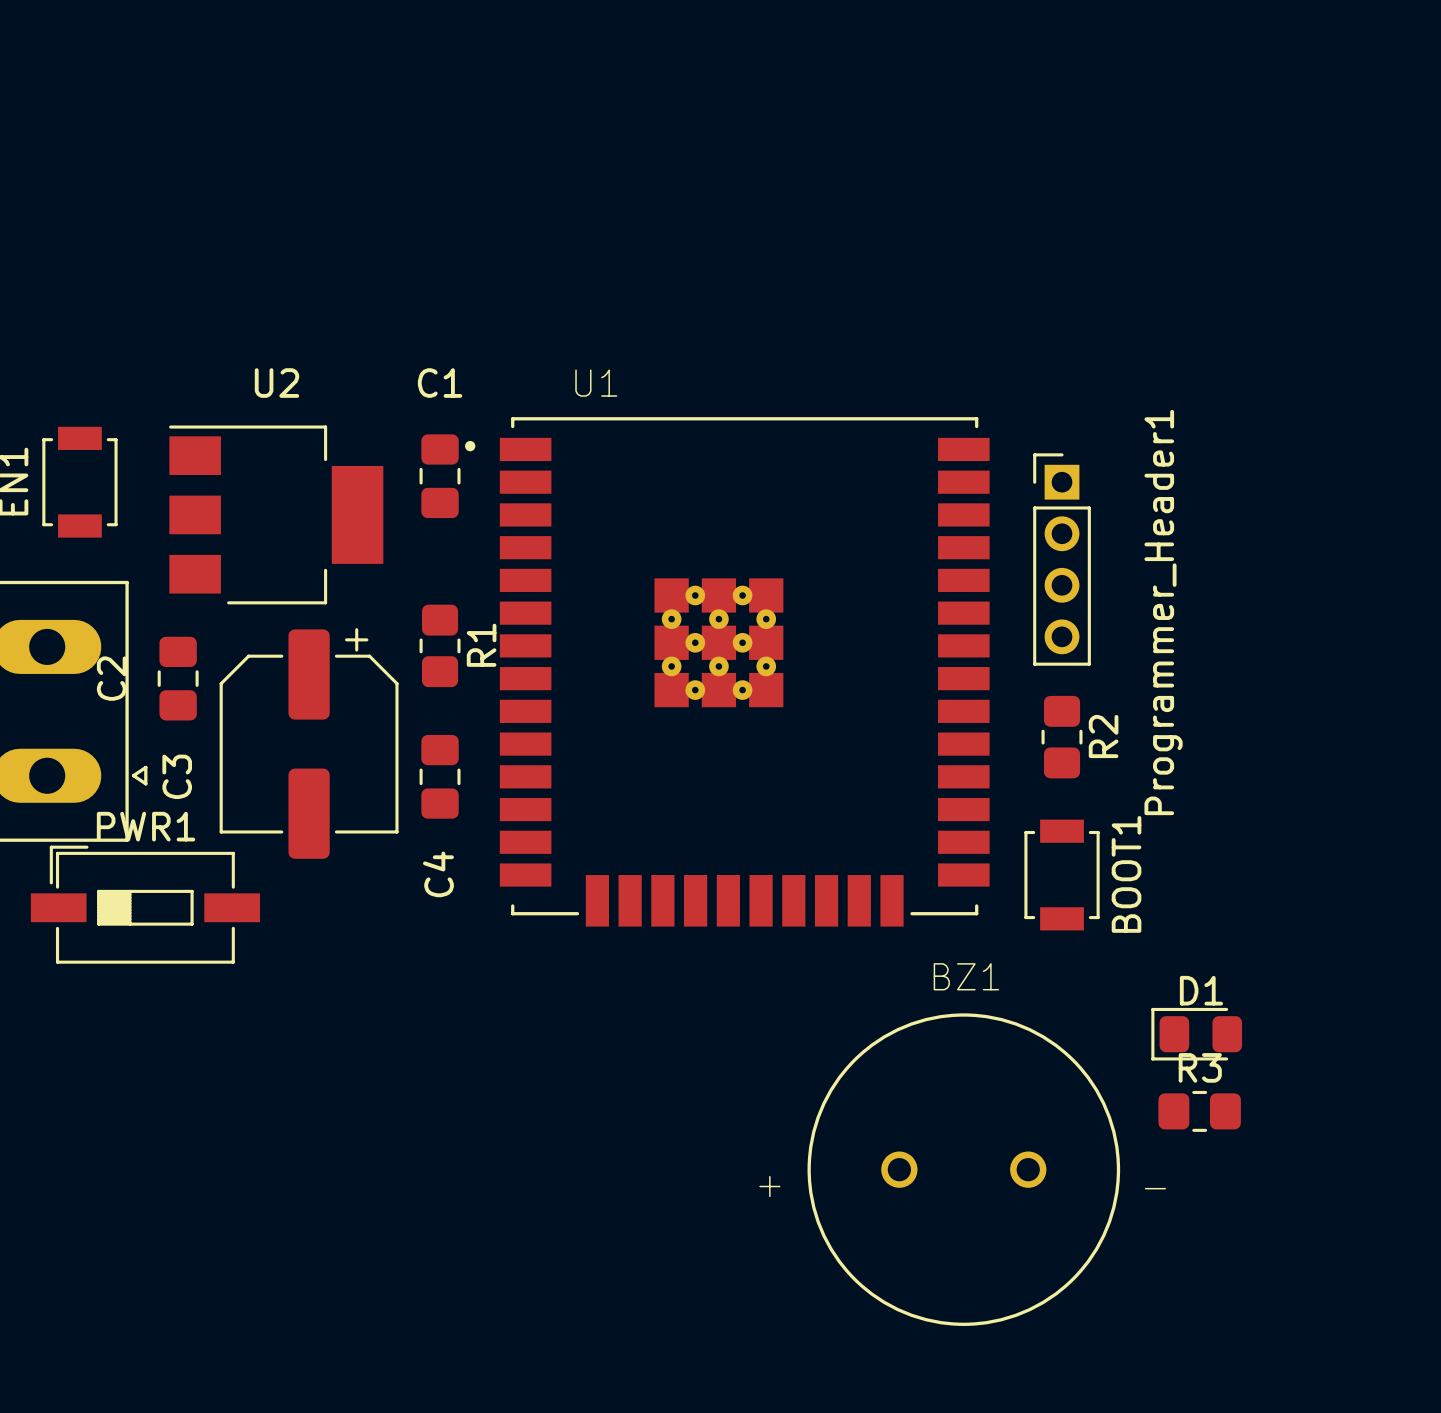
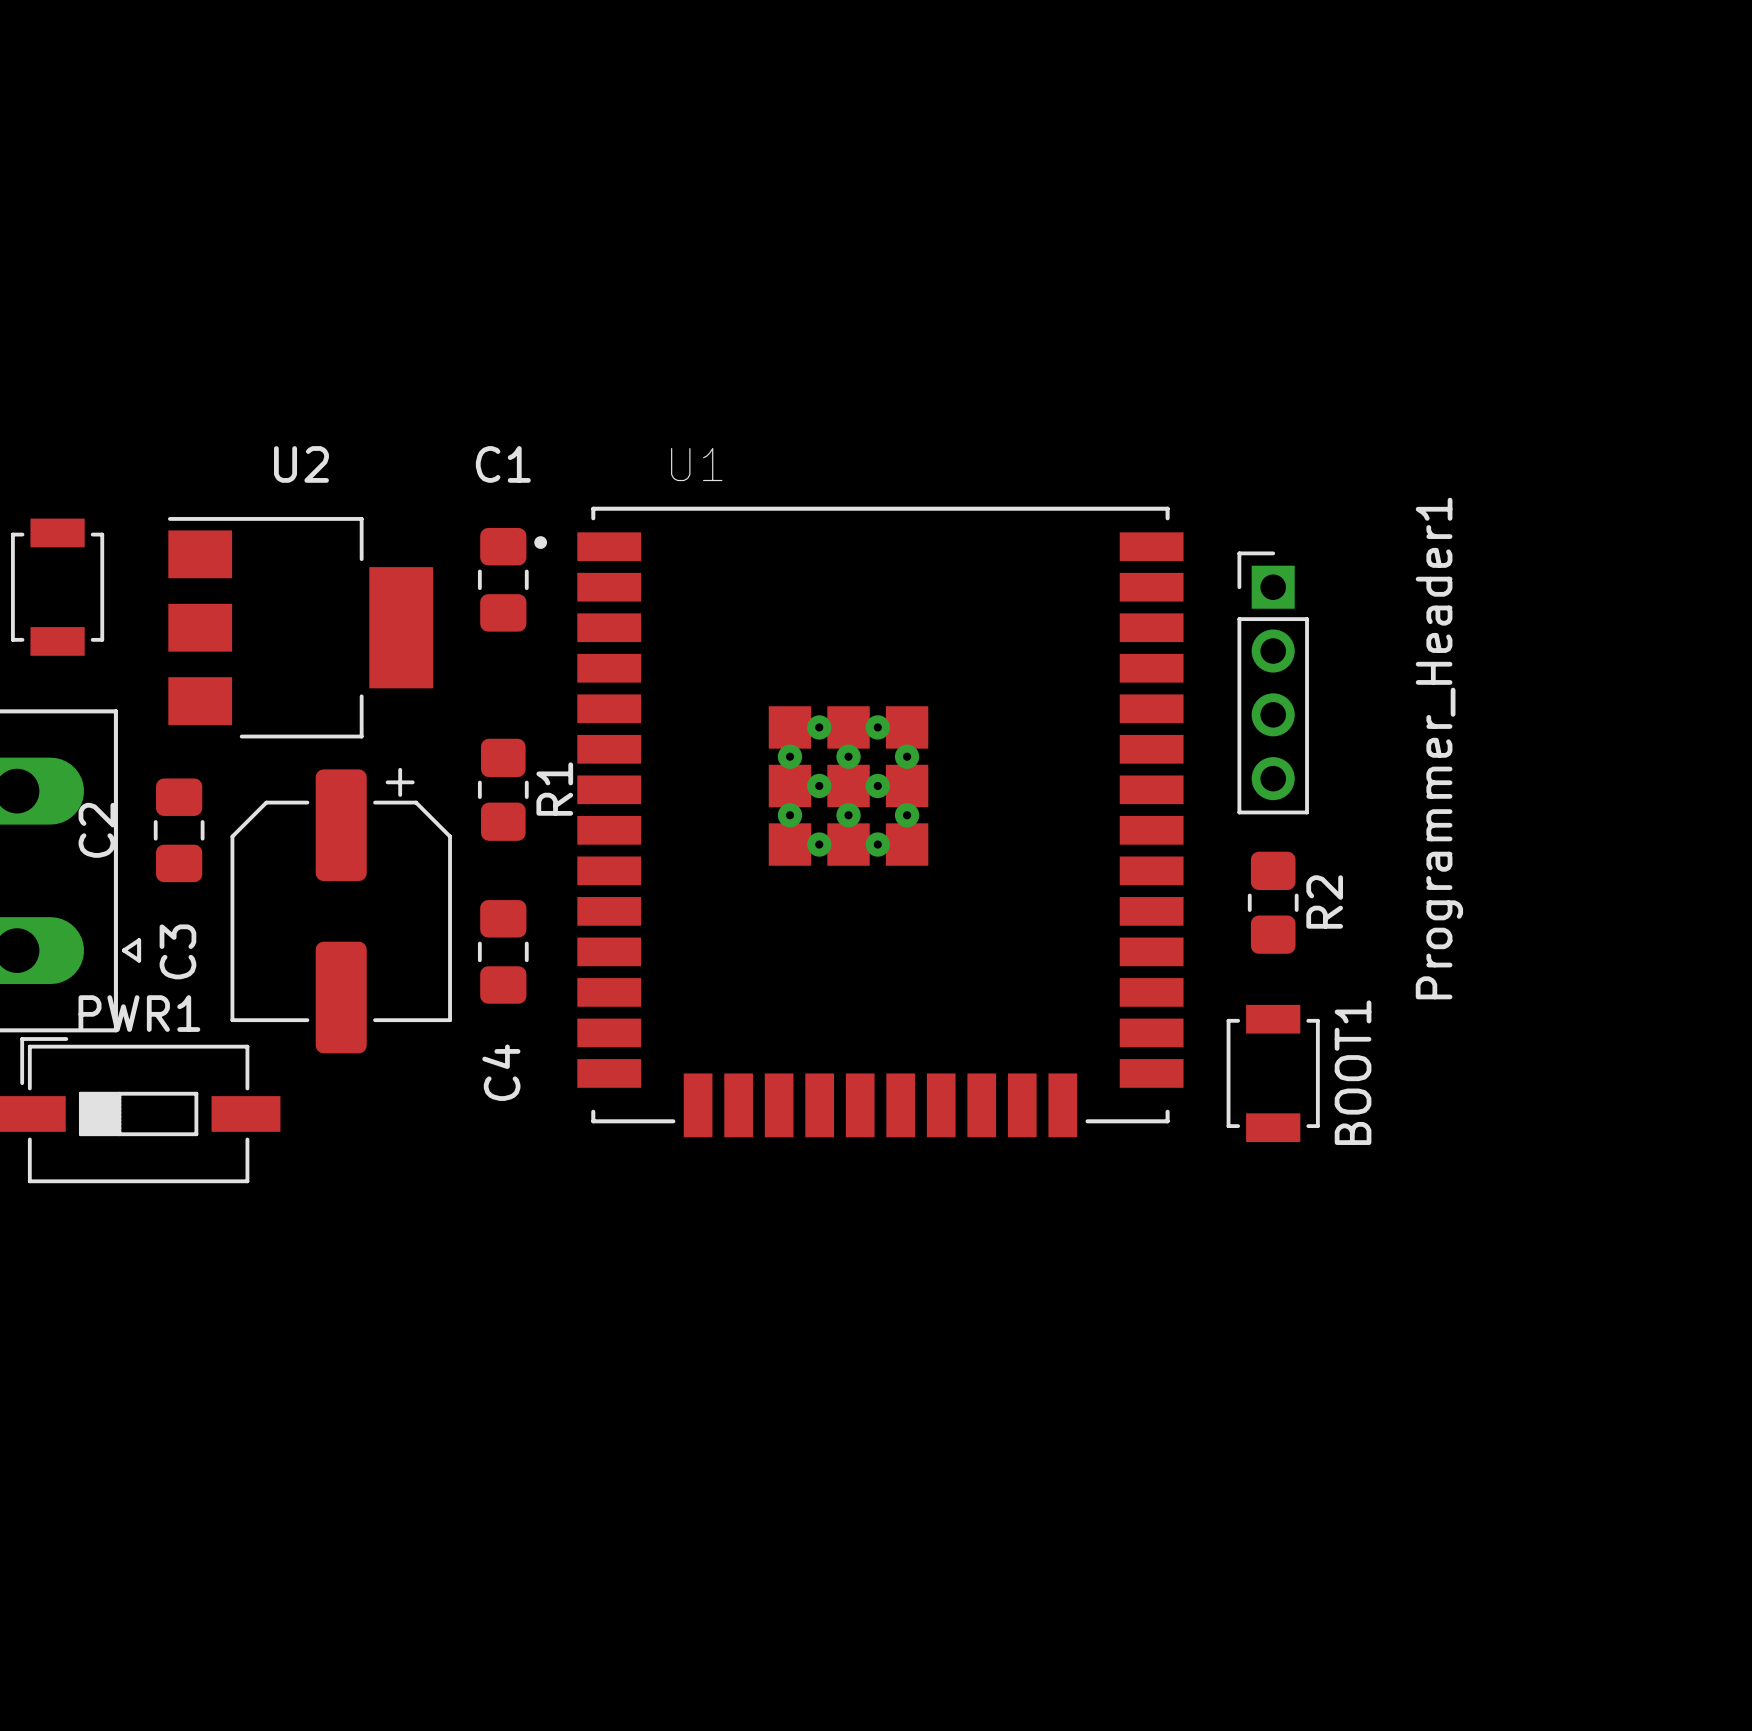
Programmer_Header1 name position: Programmer_Header1 (1163, 612) -> Programmer_Header1 (1439, 748)
D1: (1196, 1034) -> none
R3: (1199, 1111) -> none
BZ1: (963, 1169) -> none

